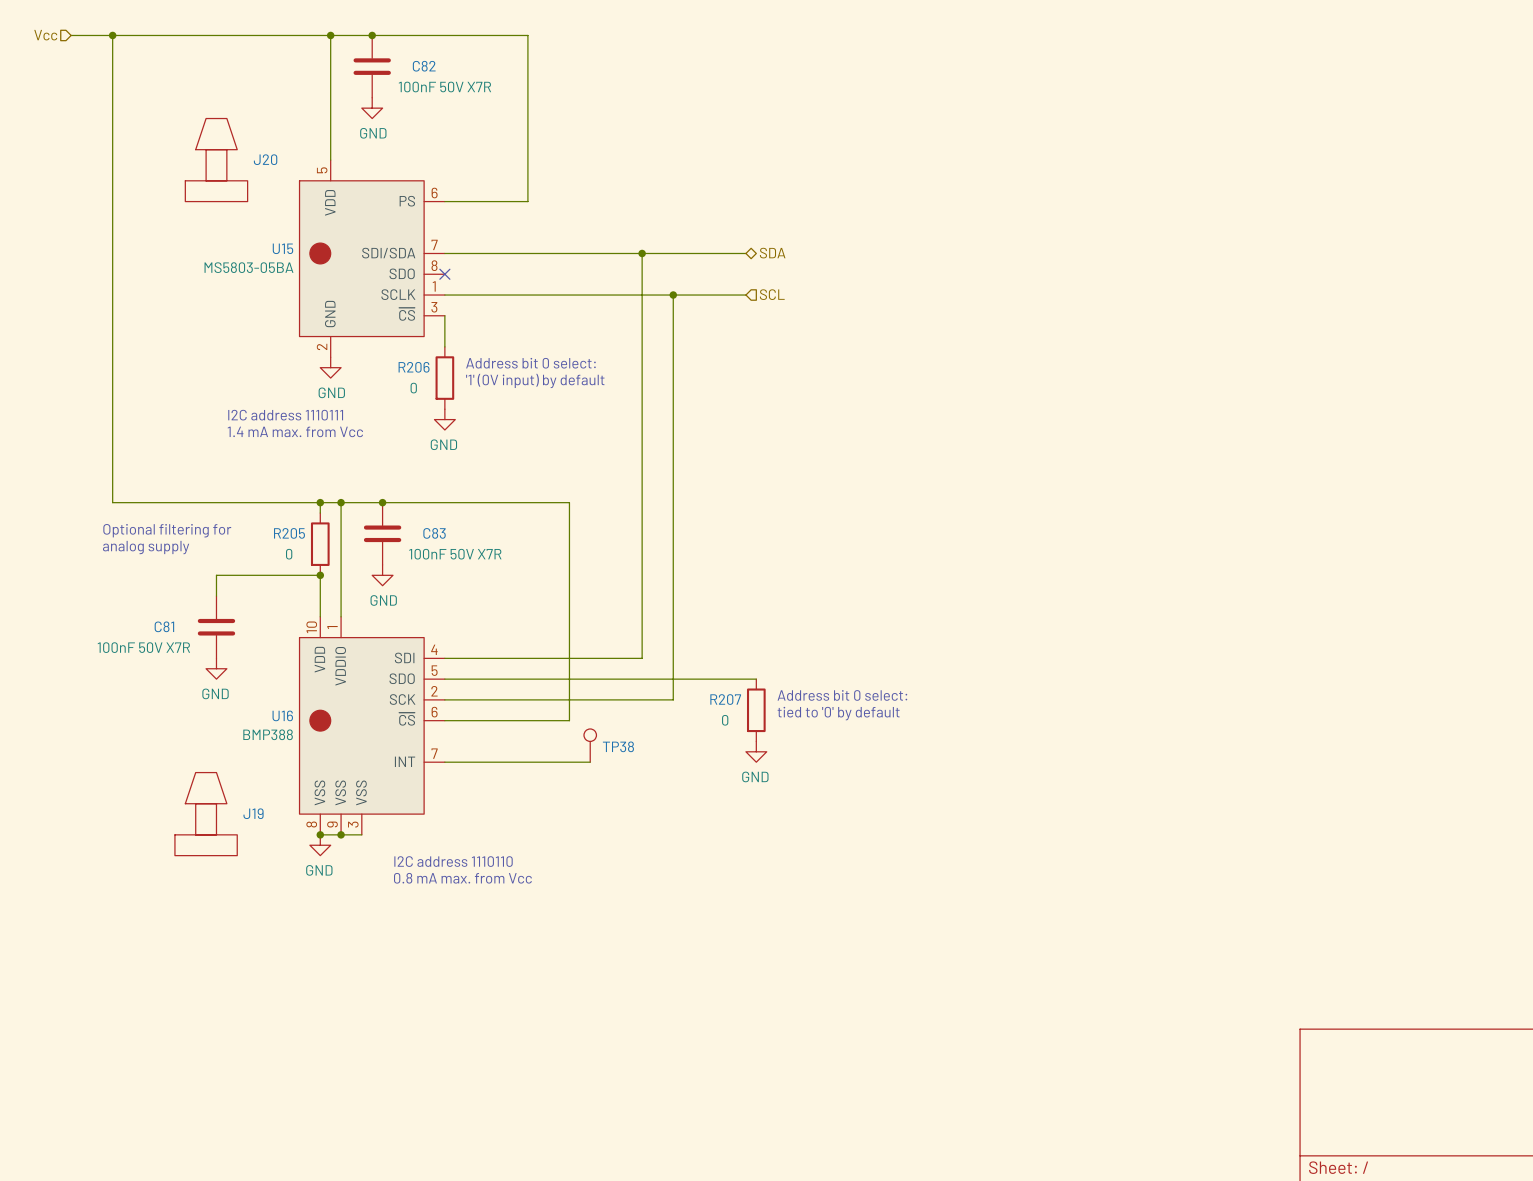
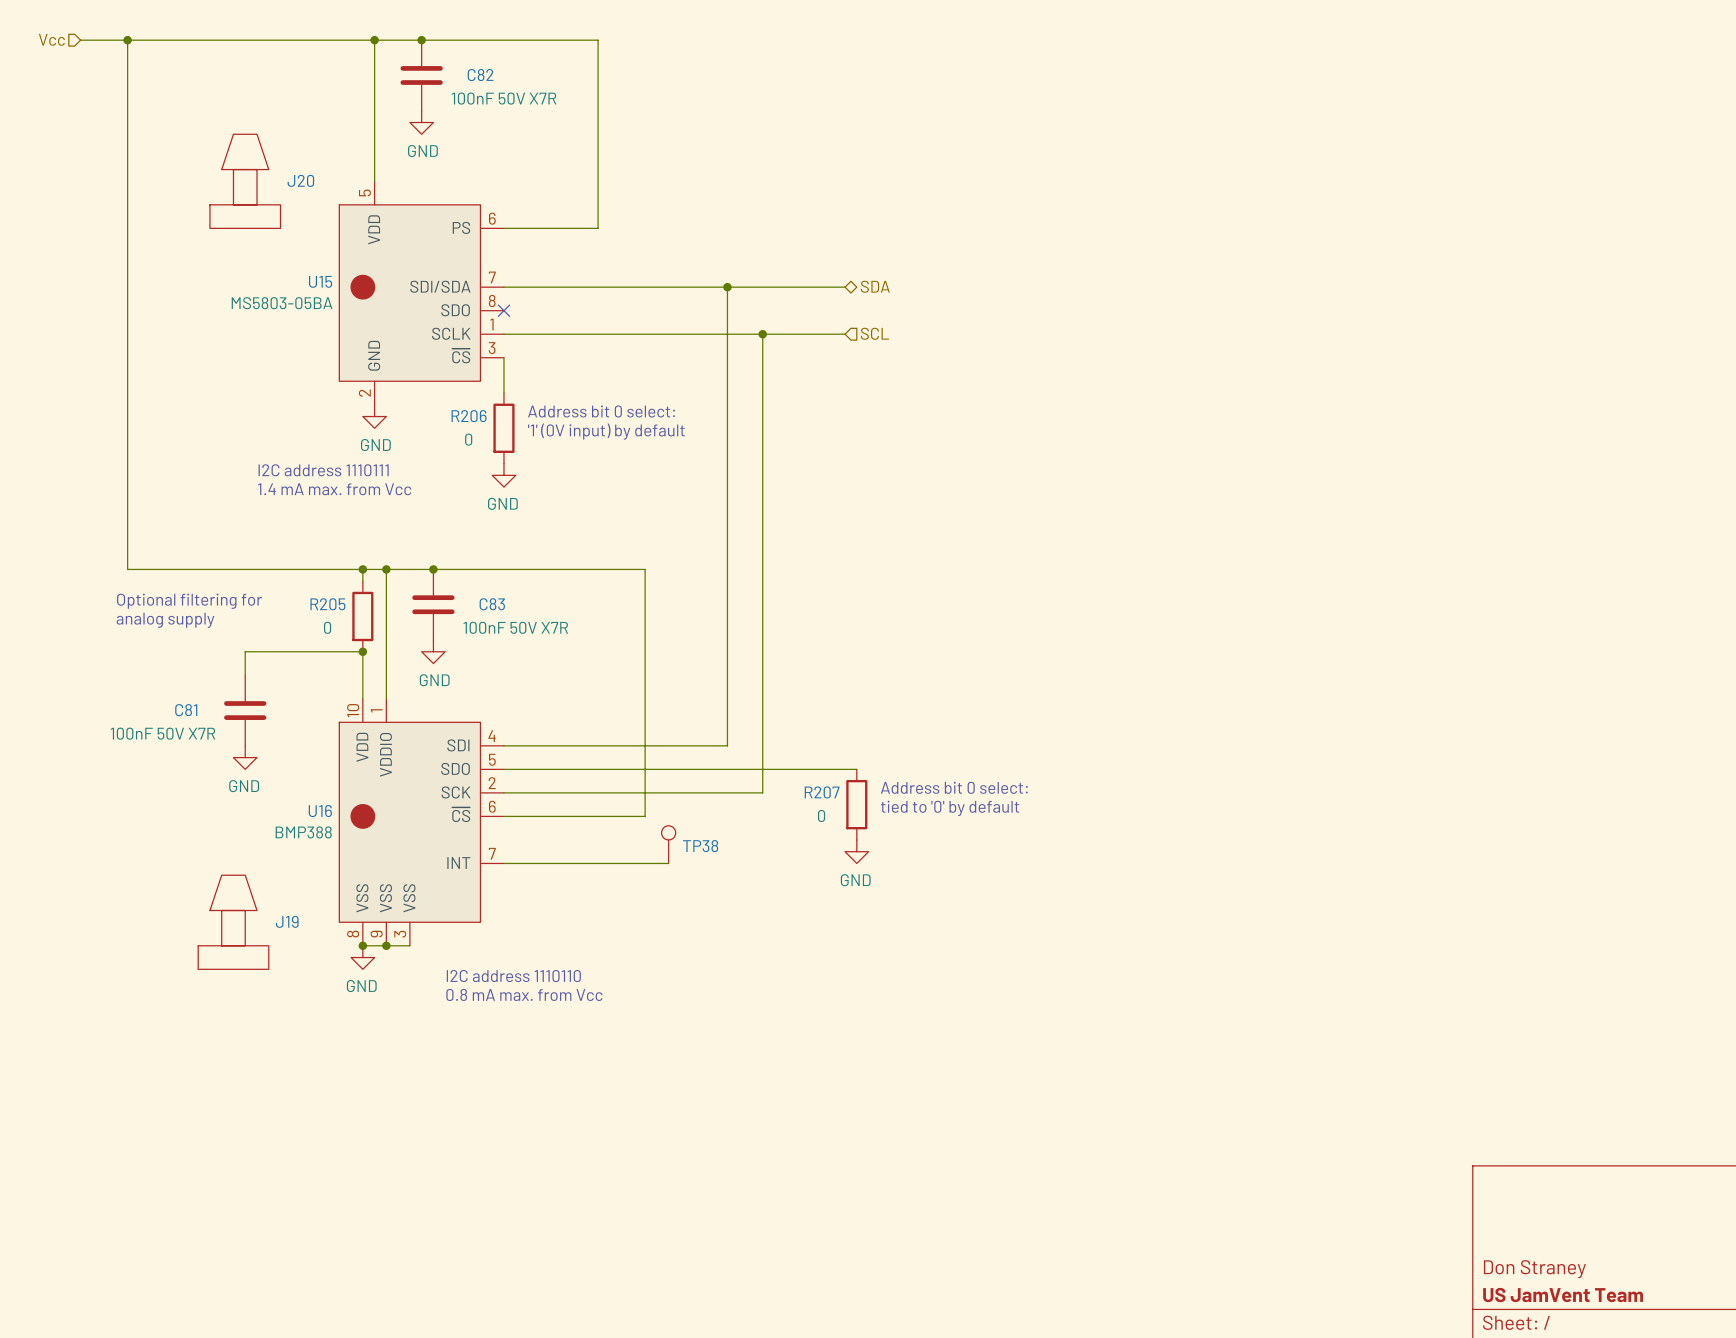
title block: none -> Don Straney (1534, 1269)
title block: none -> US JamVent Team (1563, 1295)

